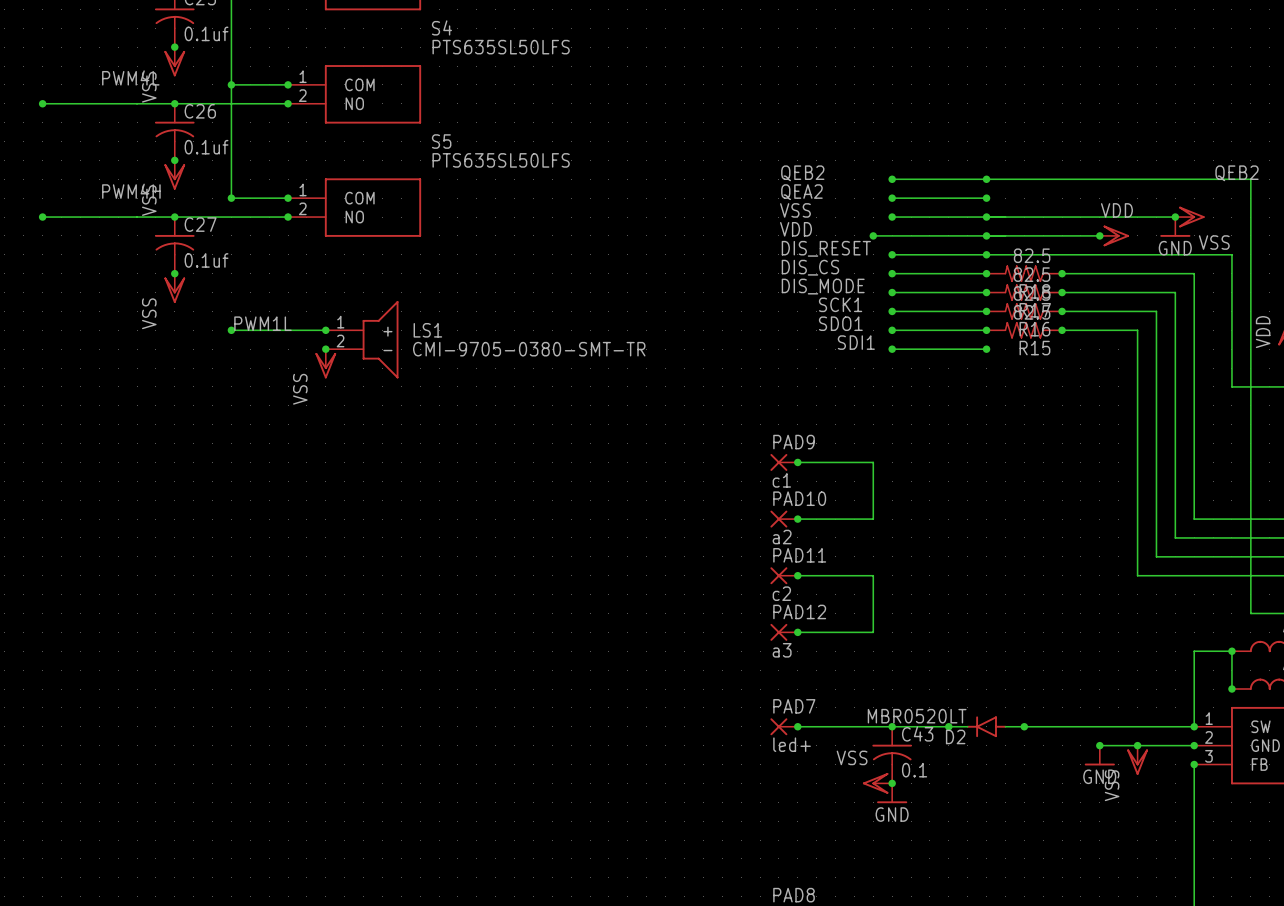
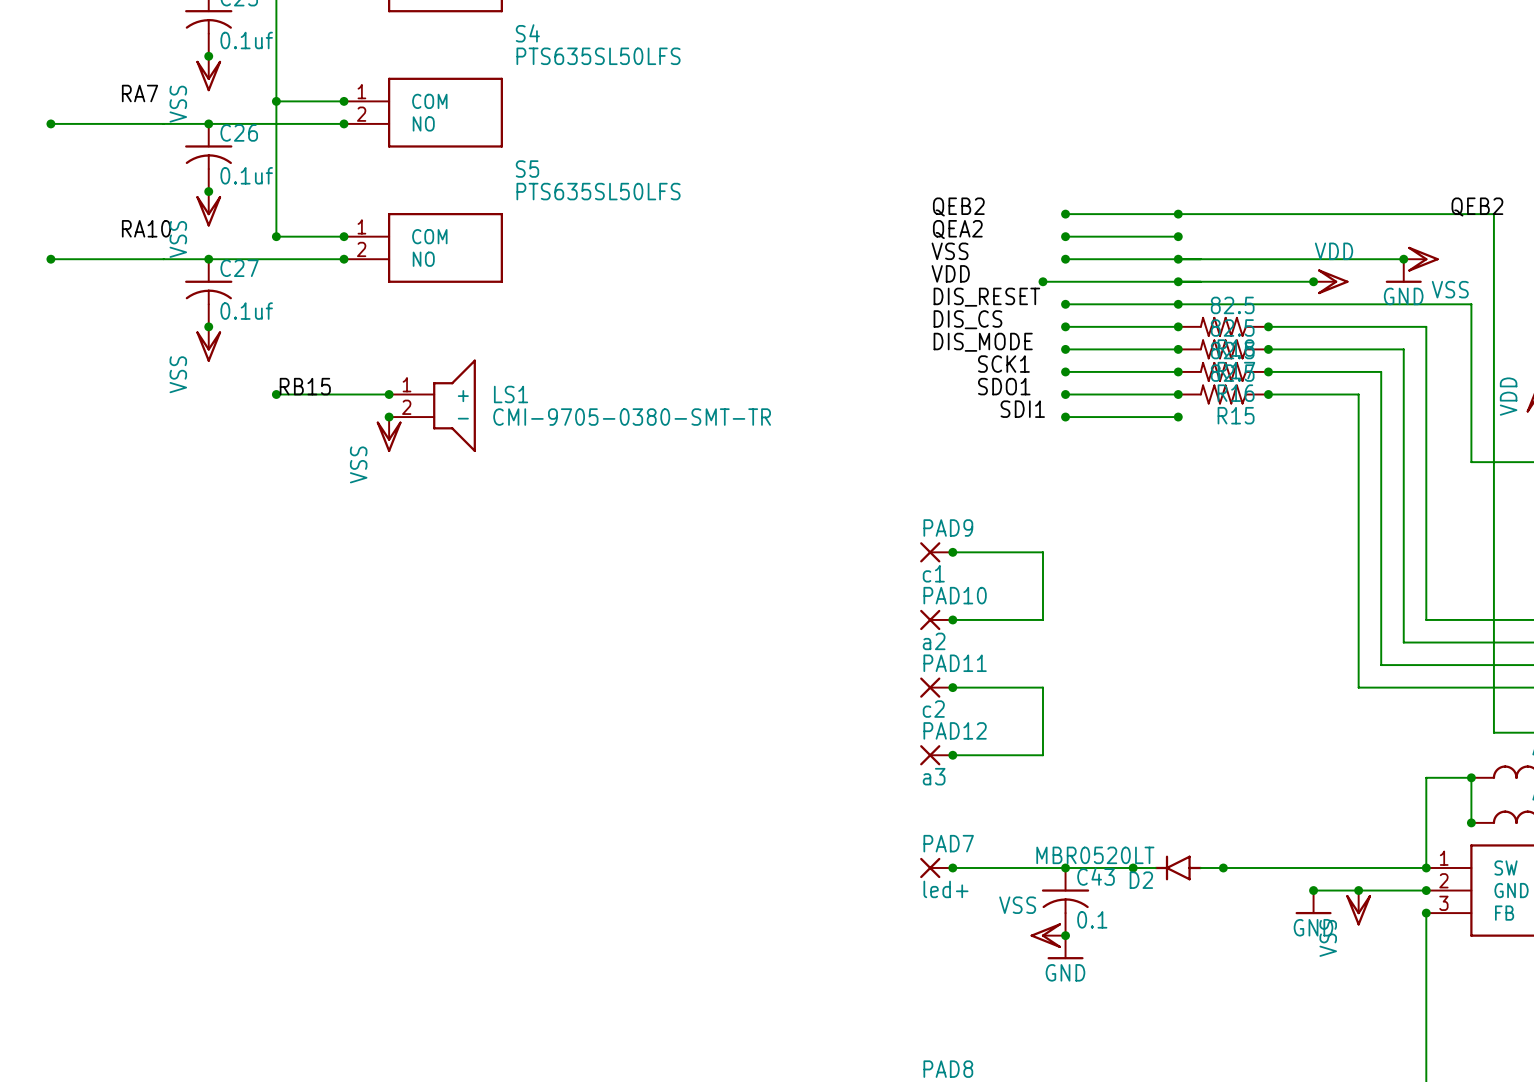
label: PWM4L (130, 77) -> RA7 (140, 93)
label: PWM4H (131, 191) -> RA10 (146, 228)
label: PWM1L (262, 323) -> RB15 (305, 386)

